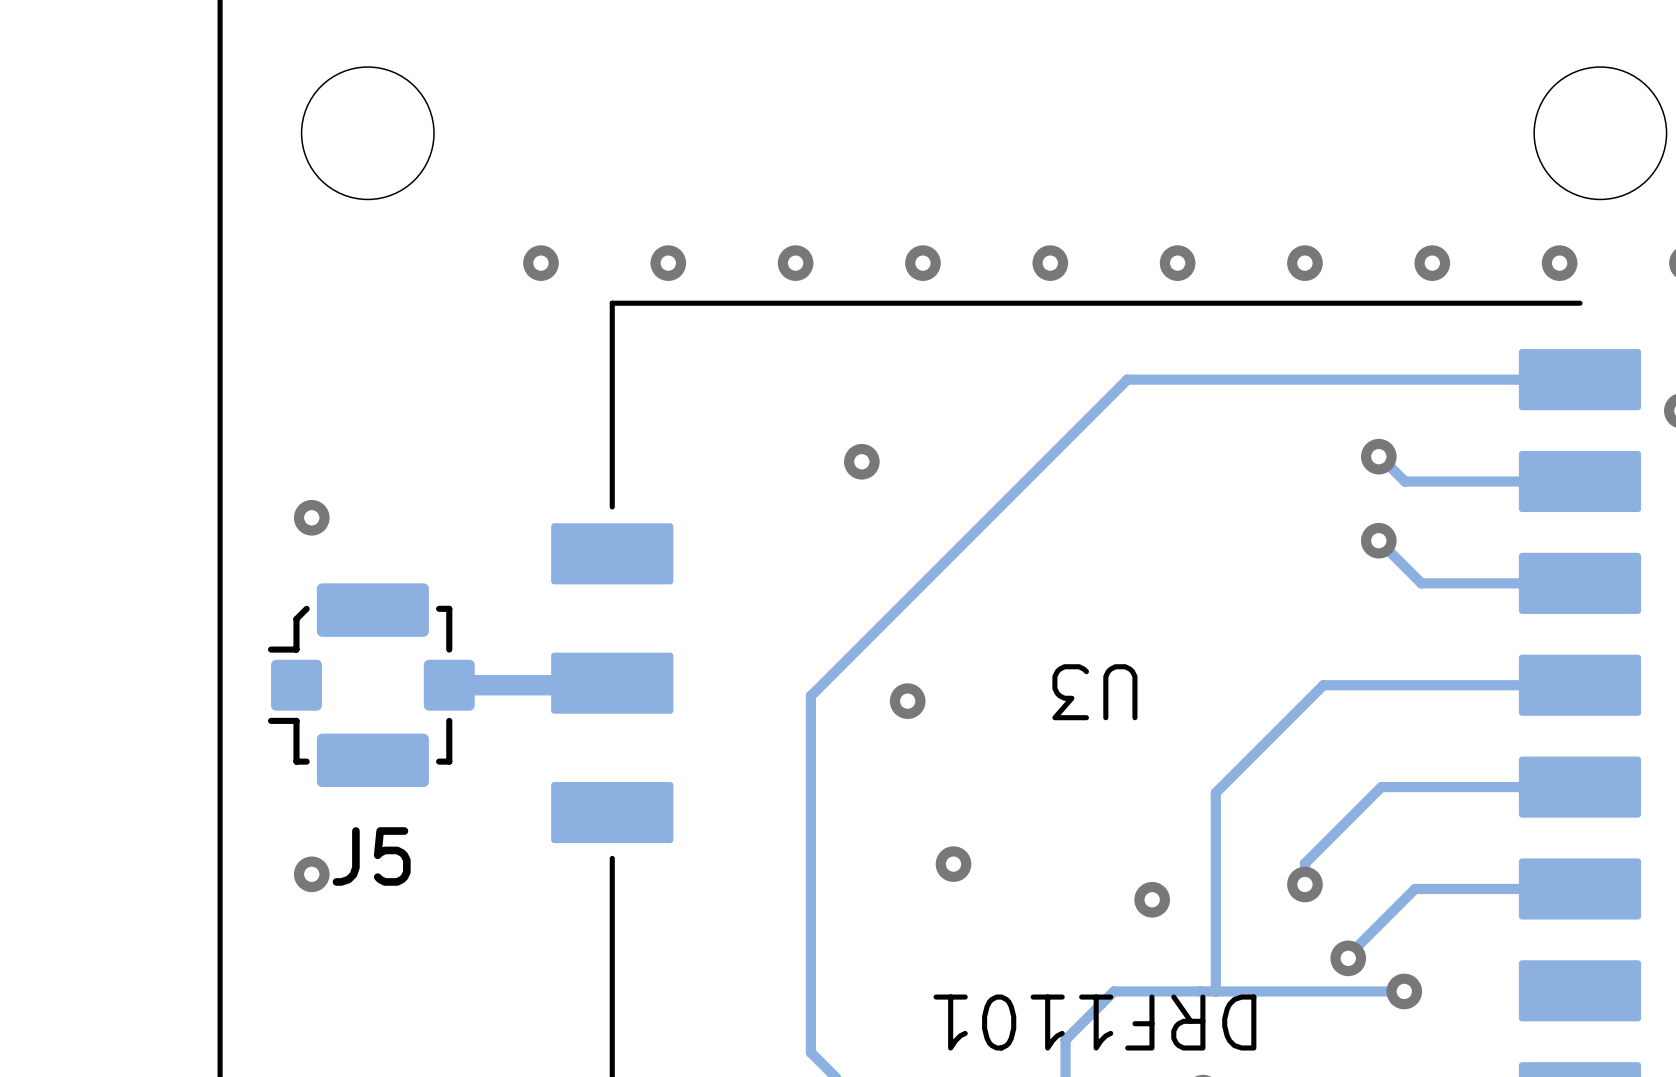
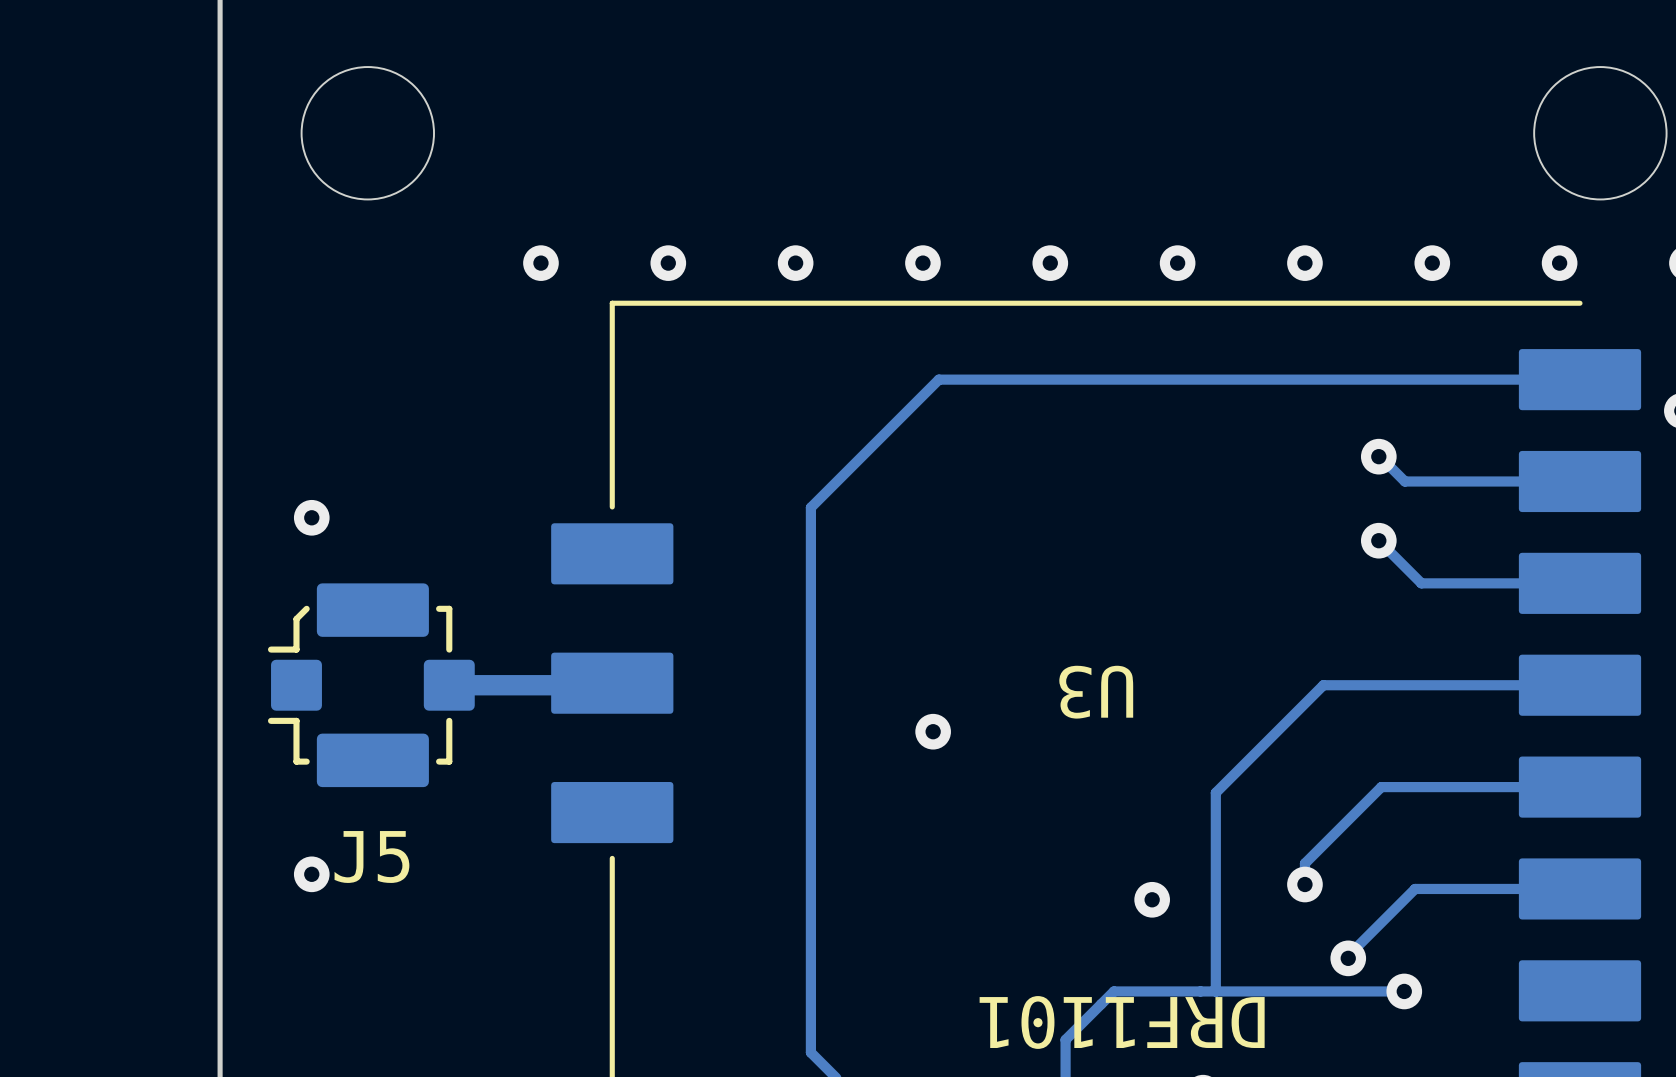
track: (1127, 379) (810, 696) -> (1127, 379) (938, 379) (810, 507) (810, 696)
via: (861, 461) -> none
via position: (907, 701) -> (933, 731)
via: (953, 864) -> none

